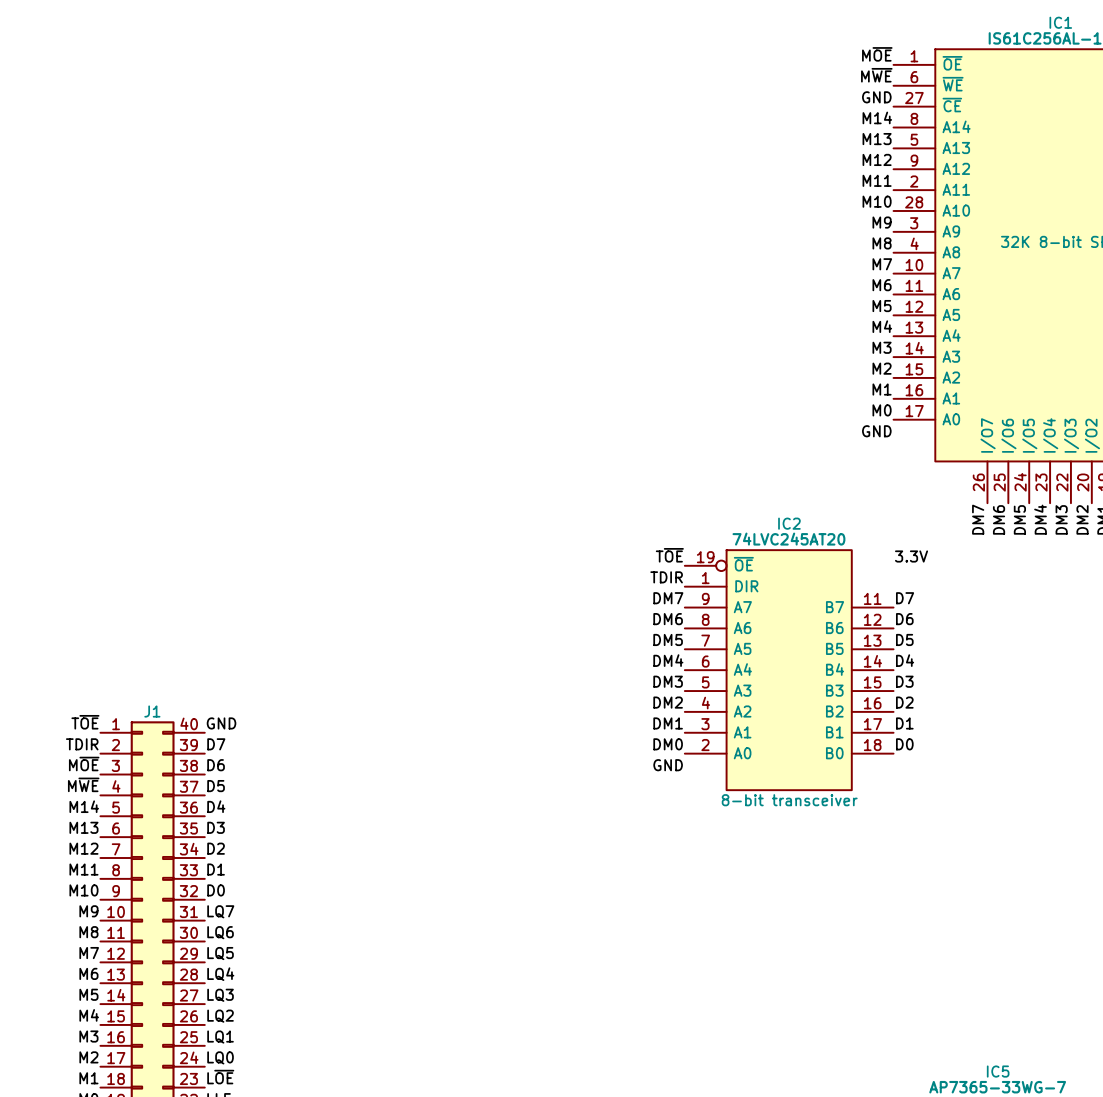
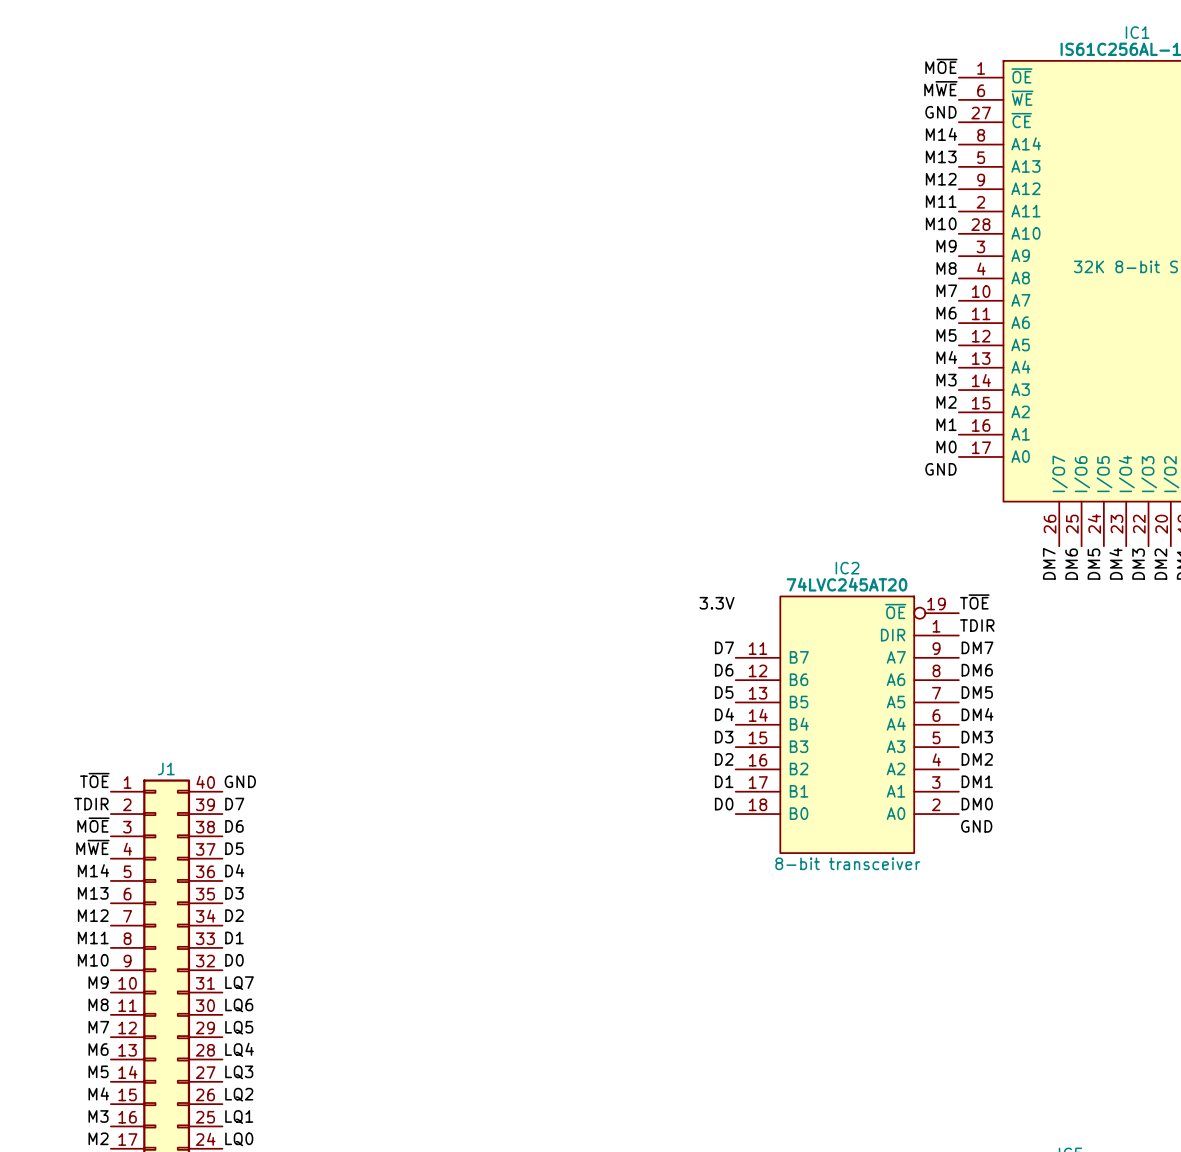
label: T~{OE} (669, 555) -> 3.3V (717, 603)
label: 3.3V (911, 556) -> T~{OE} (974, 601)
label: TDIR (666, 577) -> none
label: none -> TDIR (977, 625)
label: DM7 (668, 598) -> D7 (724, 647)
label: D7 (905, 598) -> DM7 (977, 647)
label: DM6 (668, 619) -> D6 (724, 670)
label: D6 (904, 619) -> DM6 (977, 670)
label: DM5 (668, 639) -> D5 (724, 692)
label: D5 (904, 639) -> DM5 (977, 692)
label: DM4 (668, 660) -> D4 (724, 714)
label: D4 (905, 660) -> DM4 (977, 714)
IC2 flip: as is (789, 670) -> left-right (847, 724)
label: DM3 (668, 681) -> D3 (724, 737)
label: D3 (904, 681) -> DM3 (977, 737)
label: DM2 (668, 702) -> D2 (724, 759)
label: D2 (904, 702) -> DM2 (977, 759)
label: DM1 (668, 723) -> D1 (724, 781)
label: D1 (904, 723) -> DM1 (977, 781)
label: DM0 (668, 744) -> D0 (724, 804)
label: D0 (904, 744) -> DM0 (977, 804)
label: GND (668, 765) -> none
label: none -> GND (976, 826)

